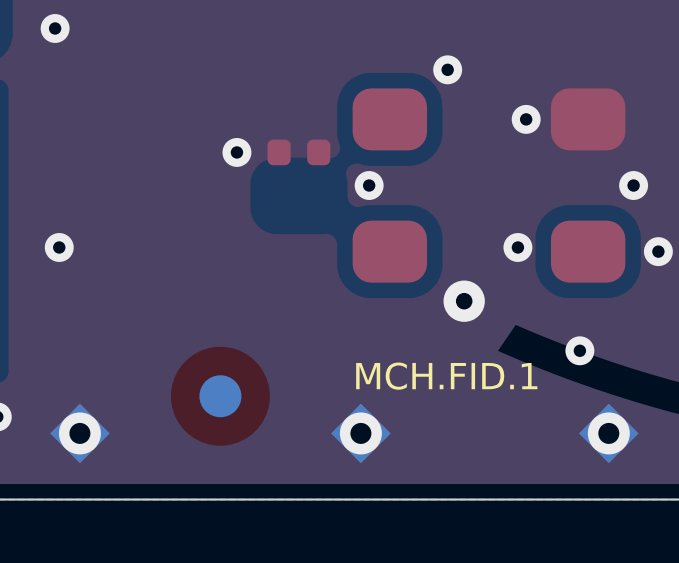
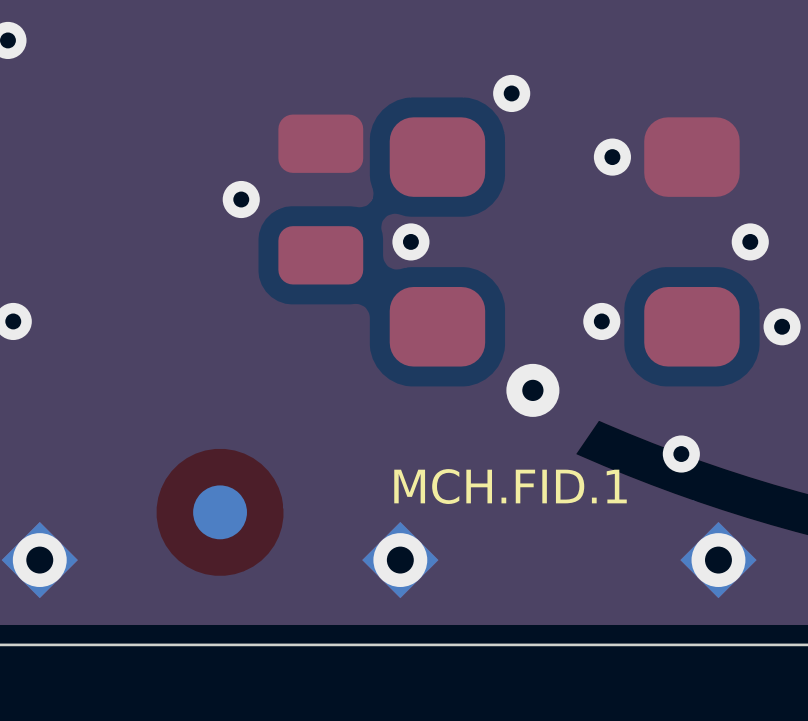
part footprint: [267, 139, 331, 166] -> [278, 114, 364, 285]

